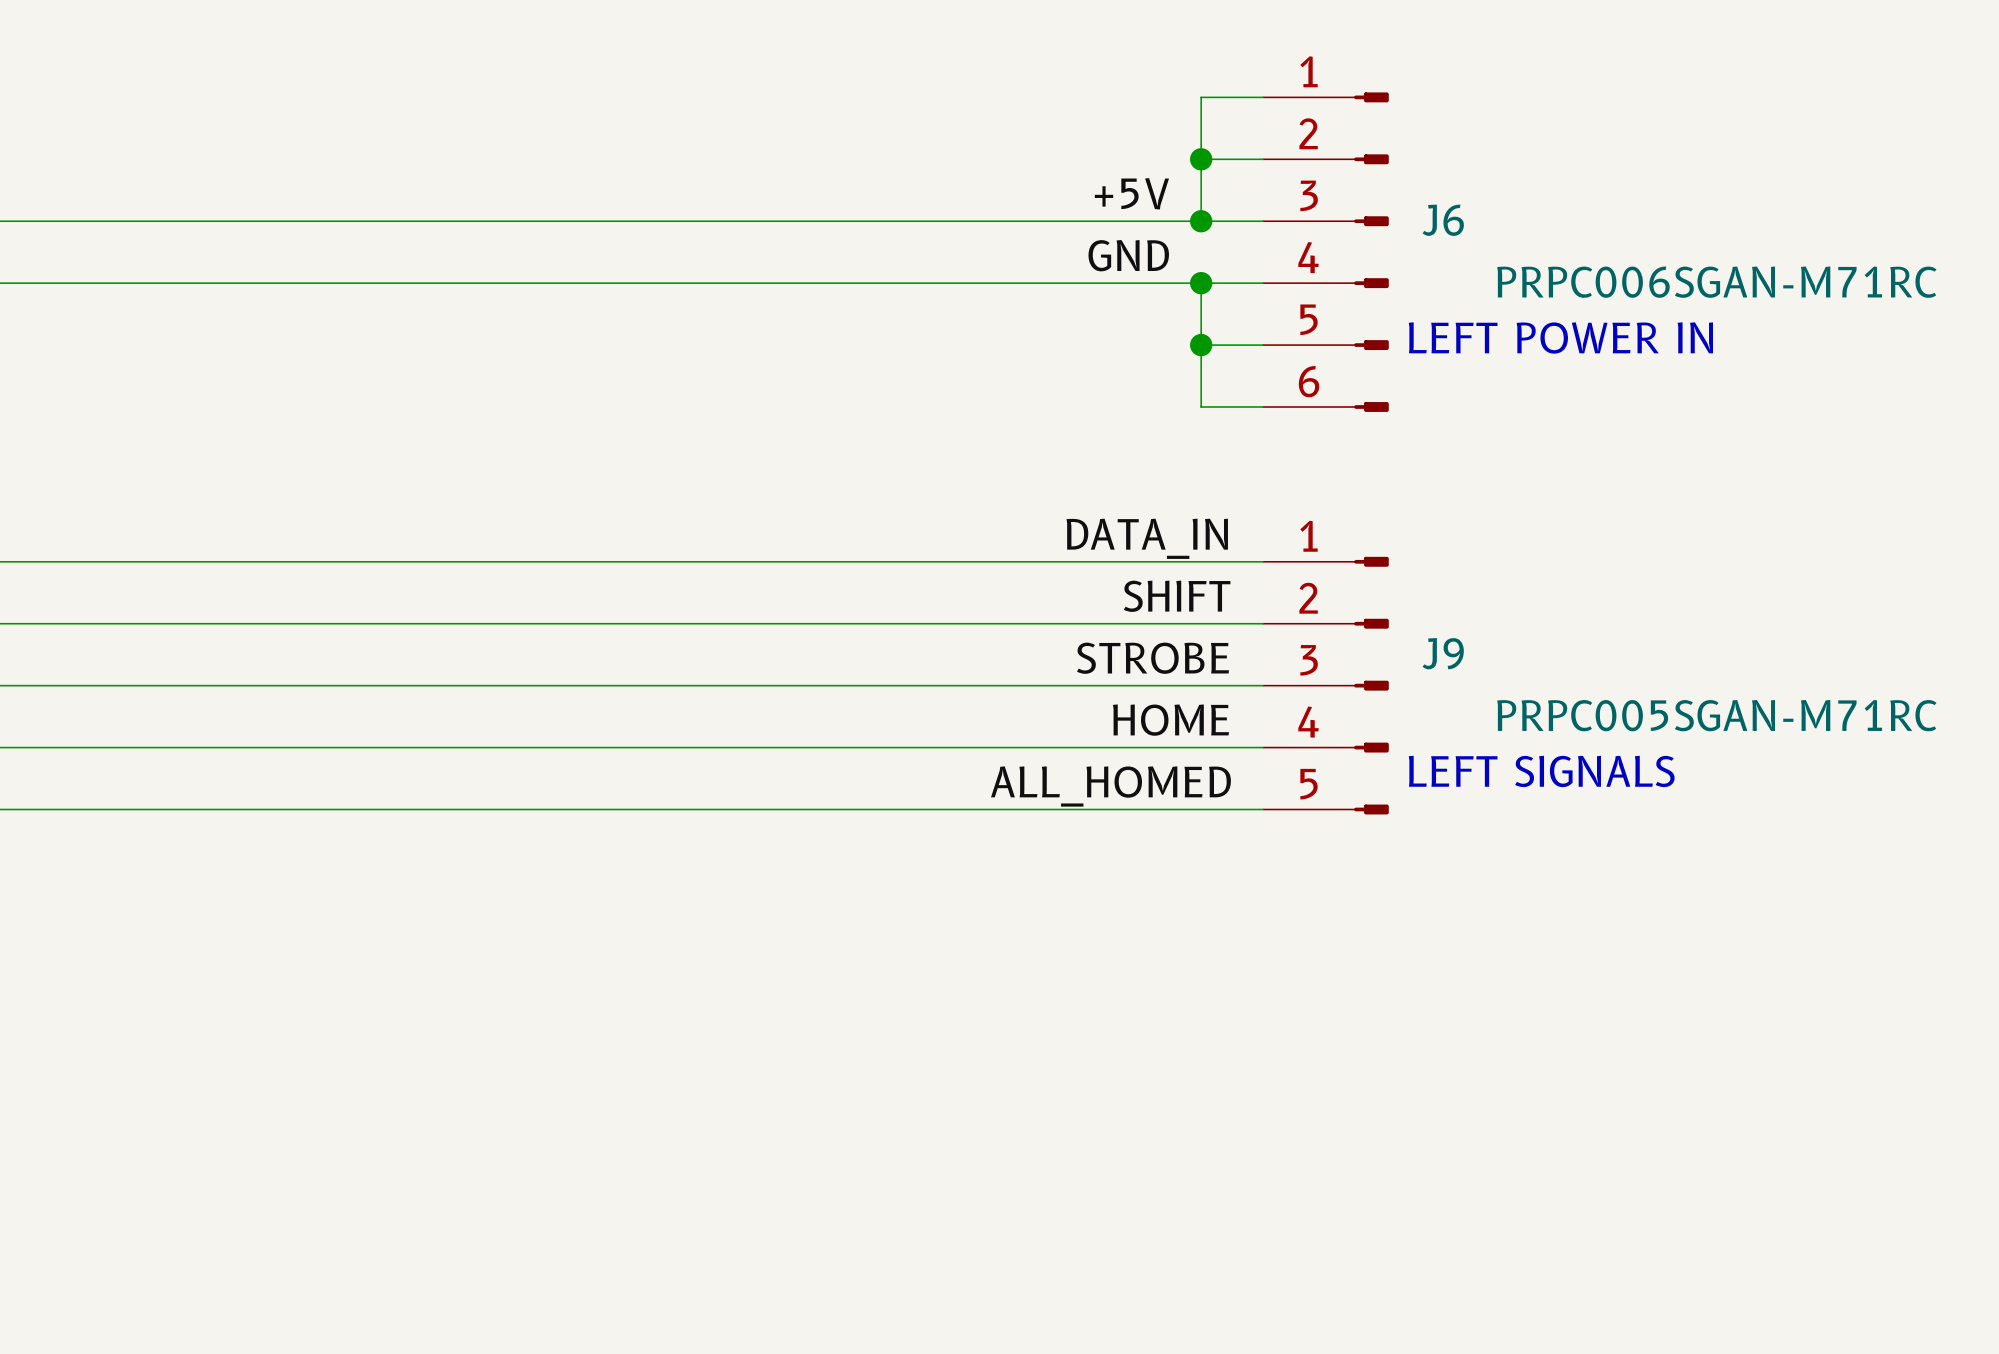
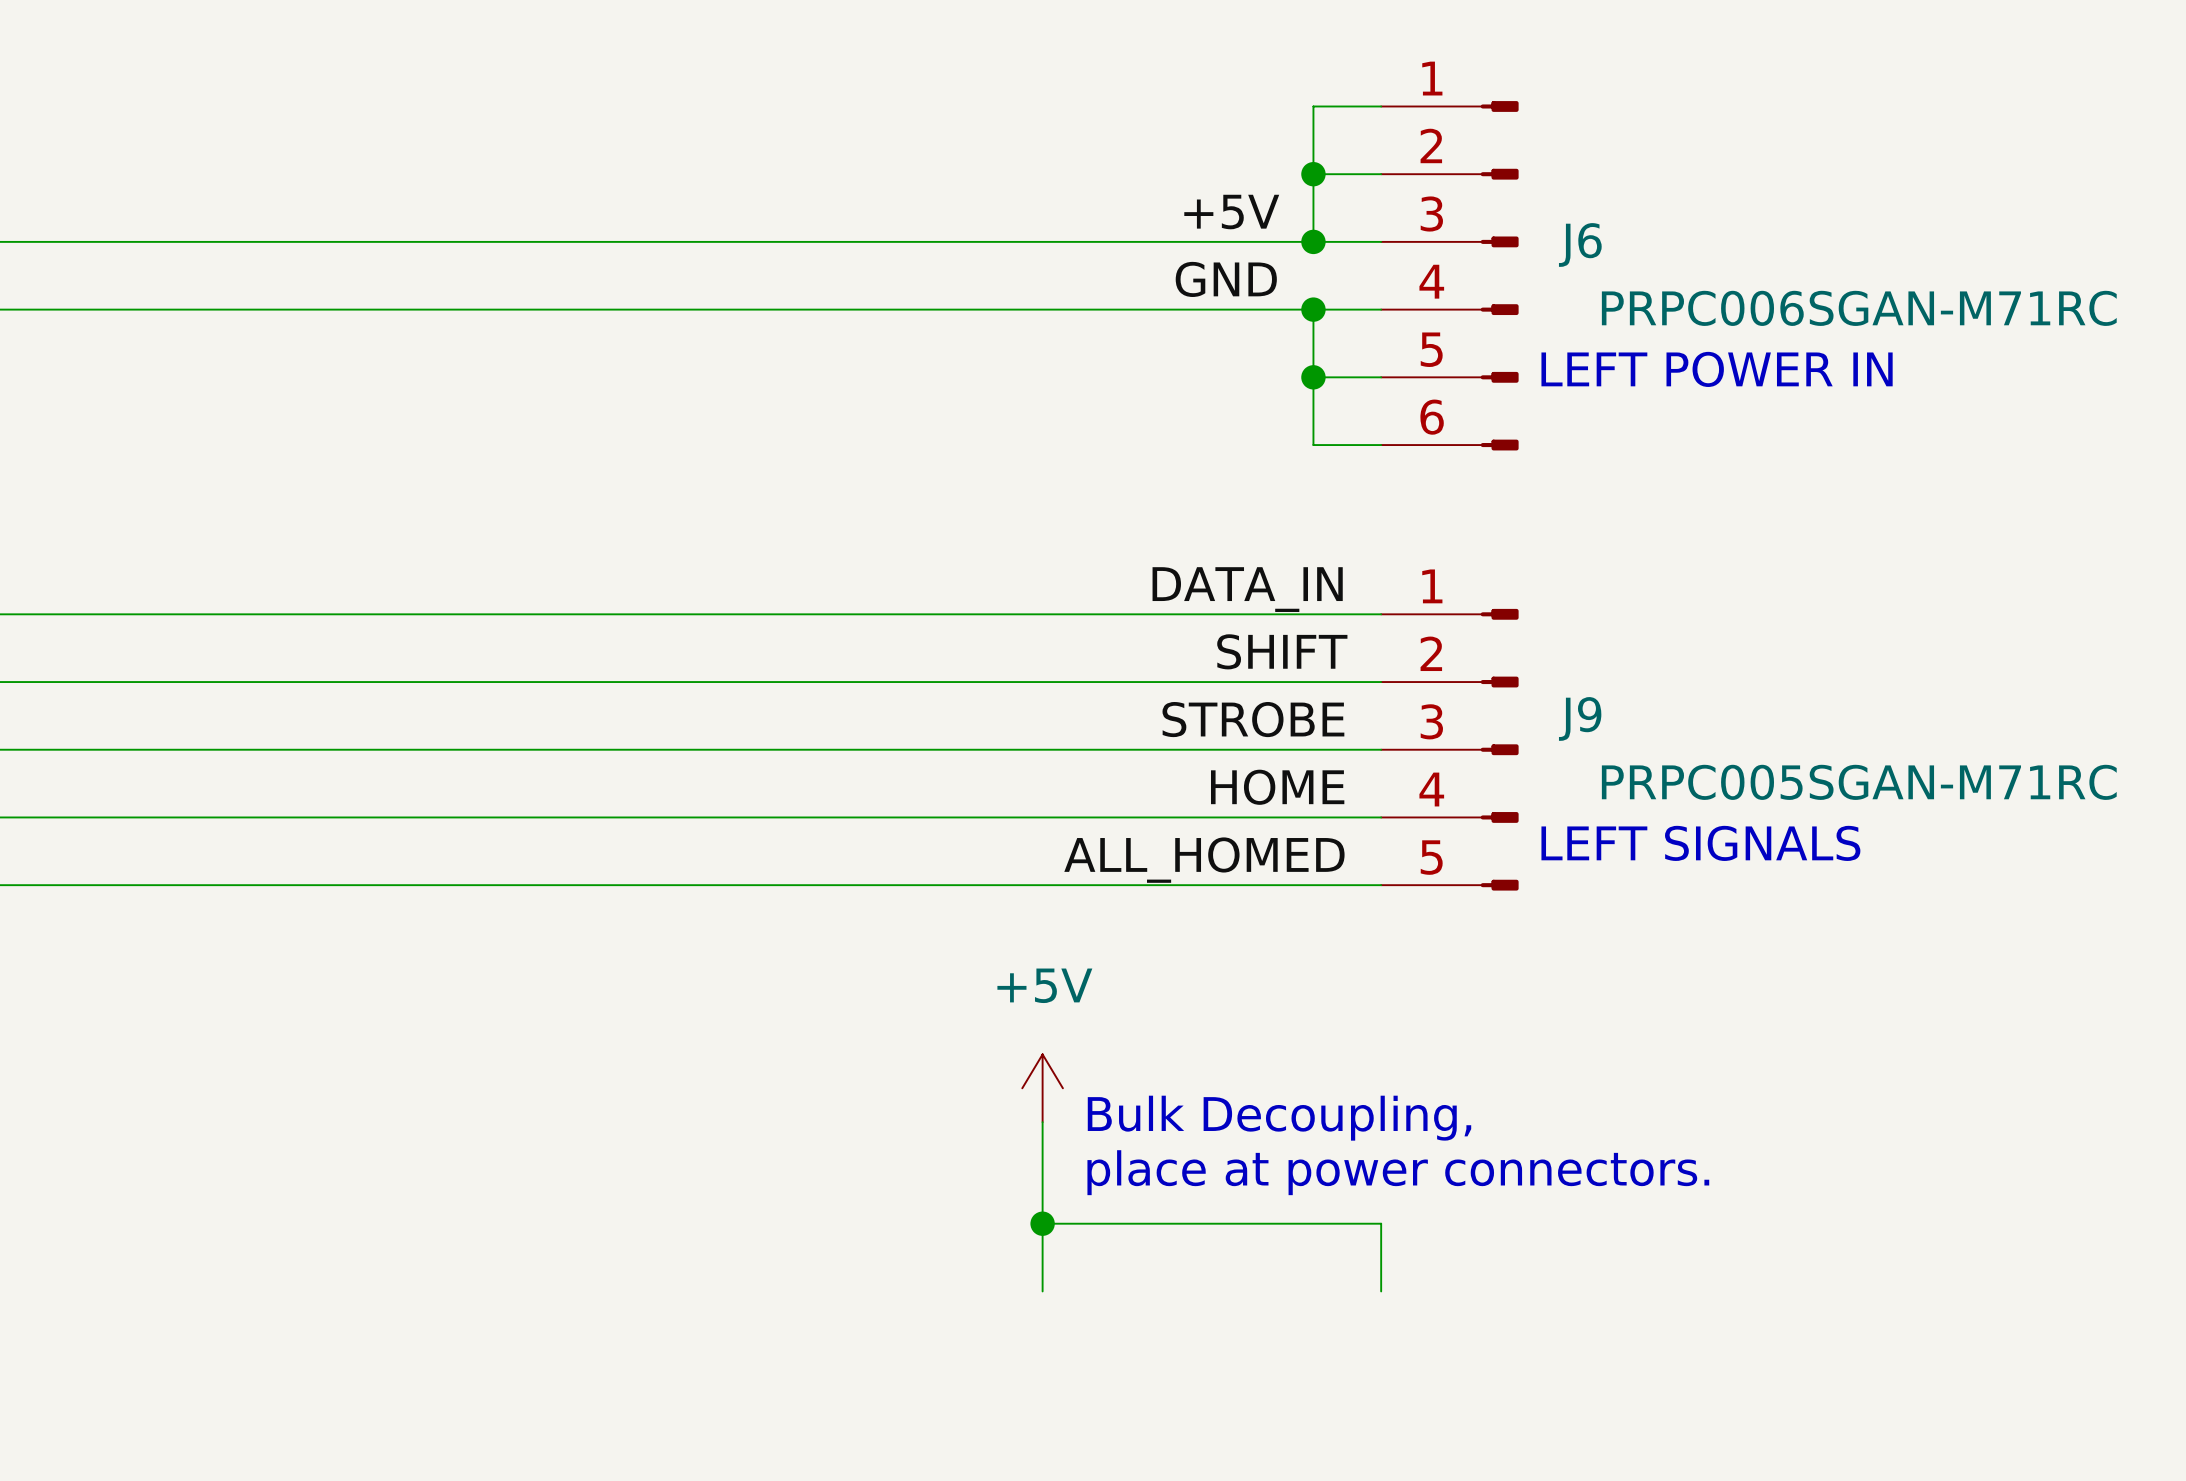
power symbol: none -> +5V (1042, 1088)
text: none -> Bulk Decoupling, (1279, 1118)
wire: none -> (1042, 1122) (1042, 1291)
text: none -> place at power connectors. (1398, 1172)
wire: none -> (1042, 1223) (1381, 1223) (1381, 1291)
junction: none -> (1042, 1223)

